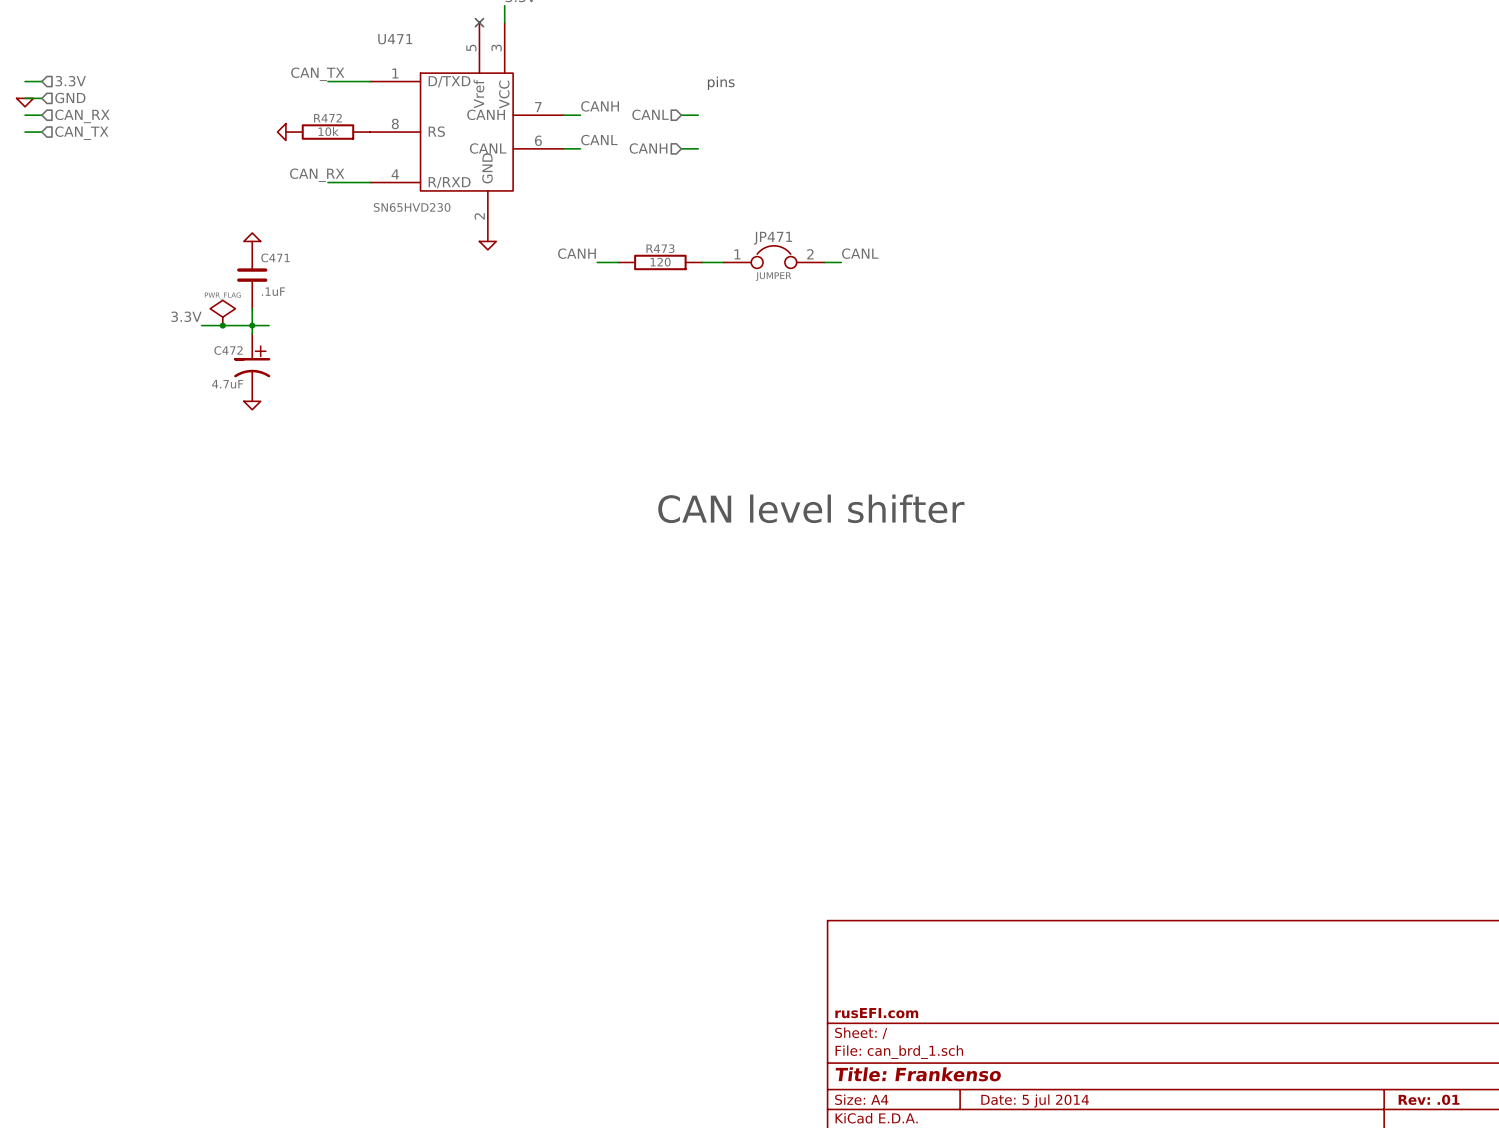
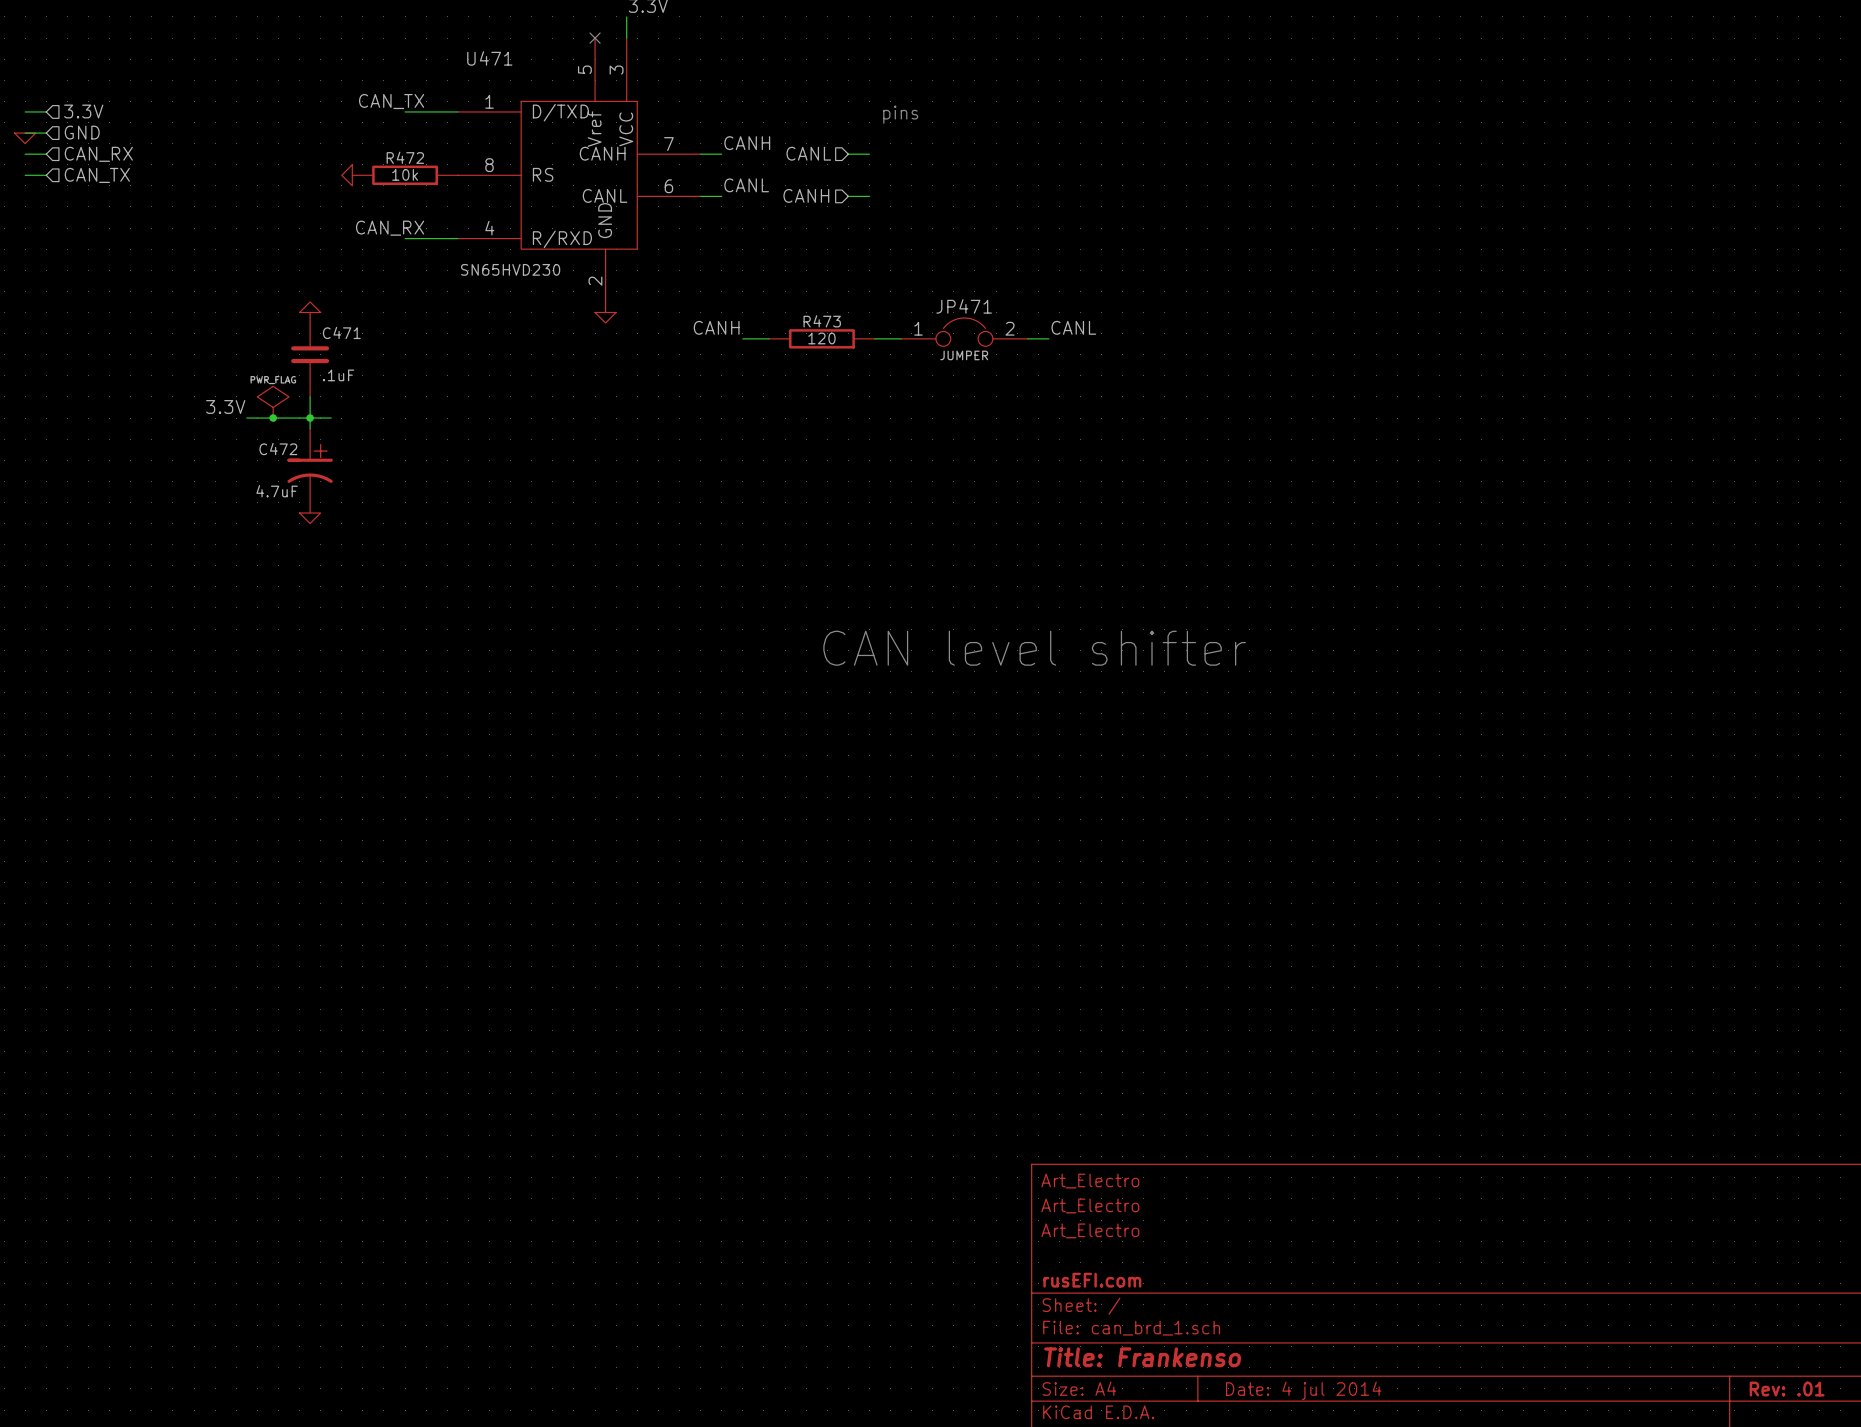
title block: none -> Art_Electro (1090, 1181)
title block: none -> Art_Electro (1090, 1205)
title block: none -> Art_Electro (1090, 1230)
title block: Date: 5 jul 2014 (1035, 1101) -> Date: 4 jul 2014 (1303, 1390)

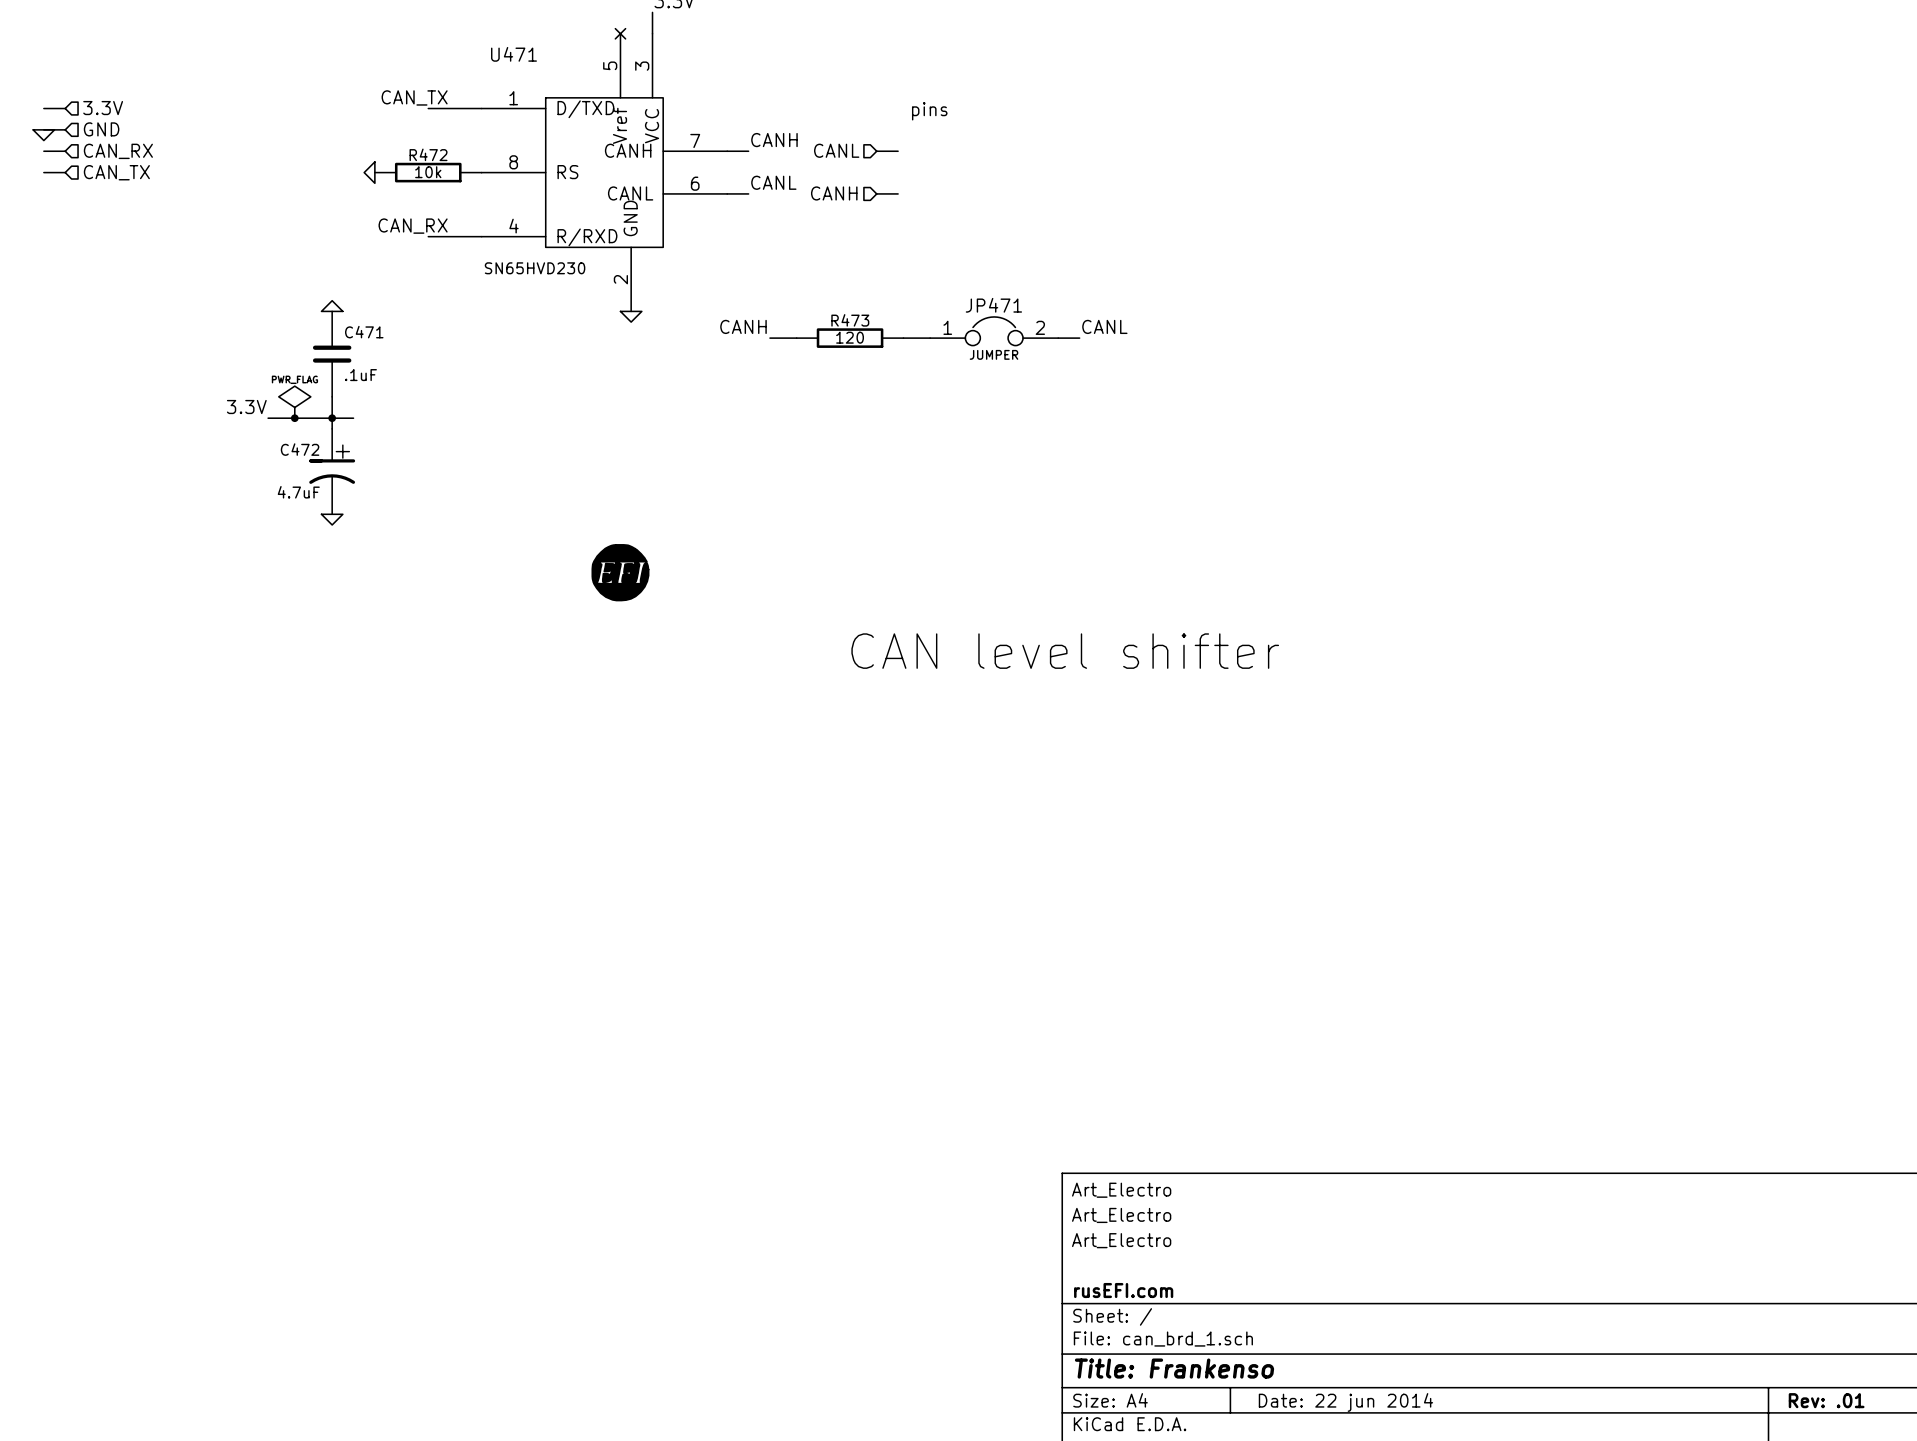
part: none -> (620, 572)
title block: Date: 4 jul 2014 (1303, 1390) -> Date: 22 jun 2014 (1345, 1402)

